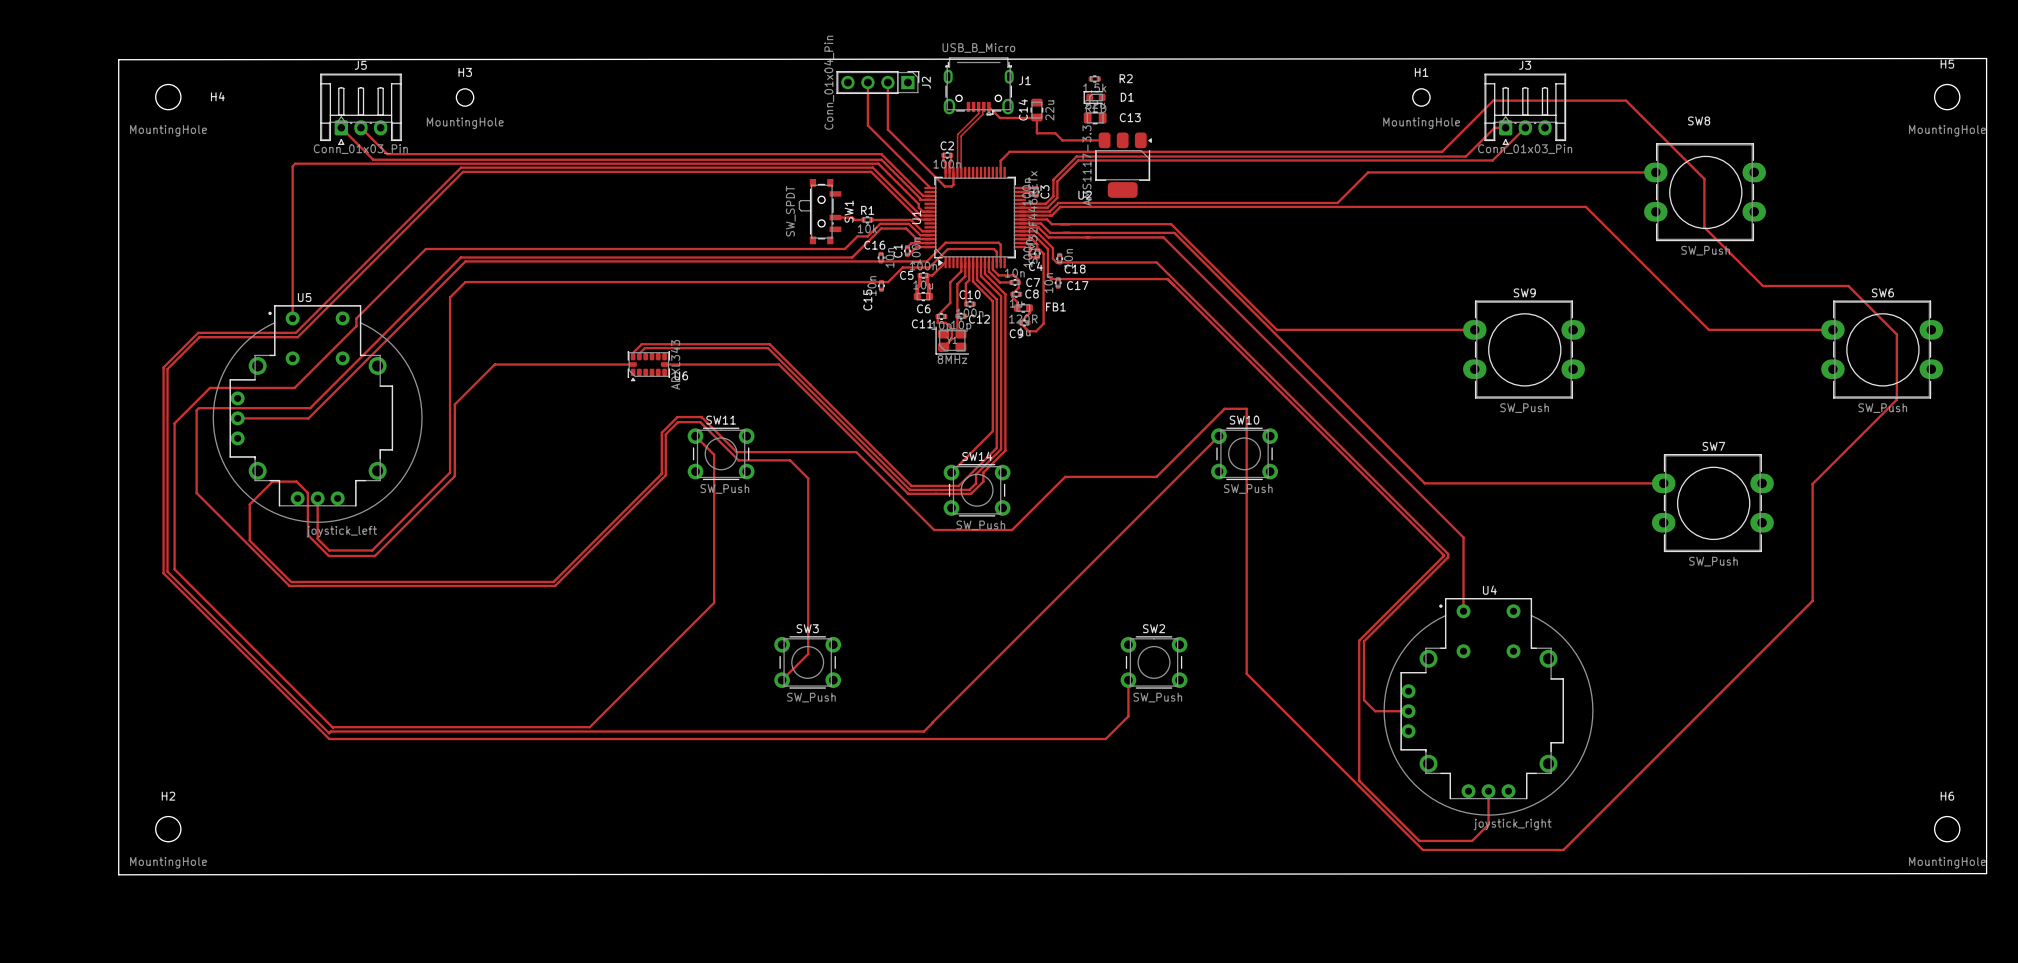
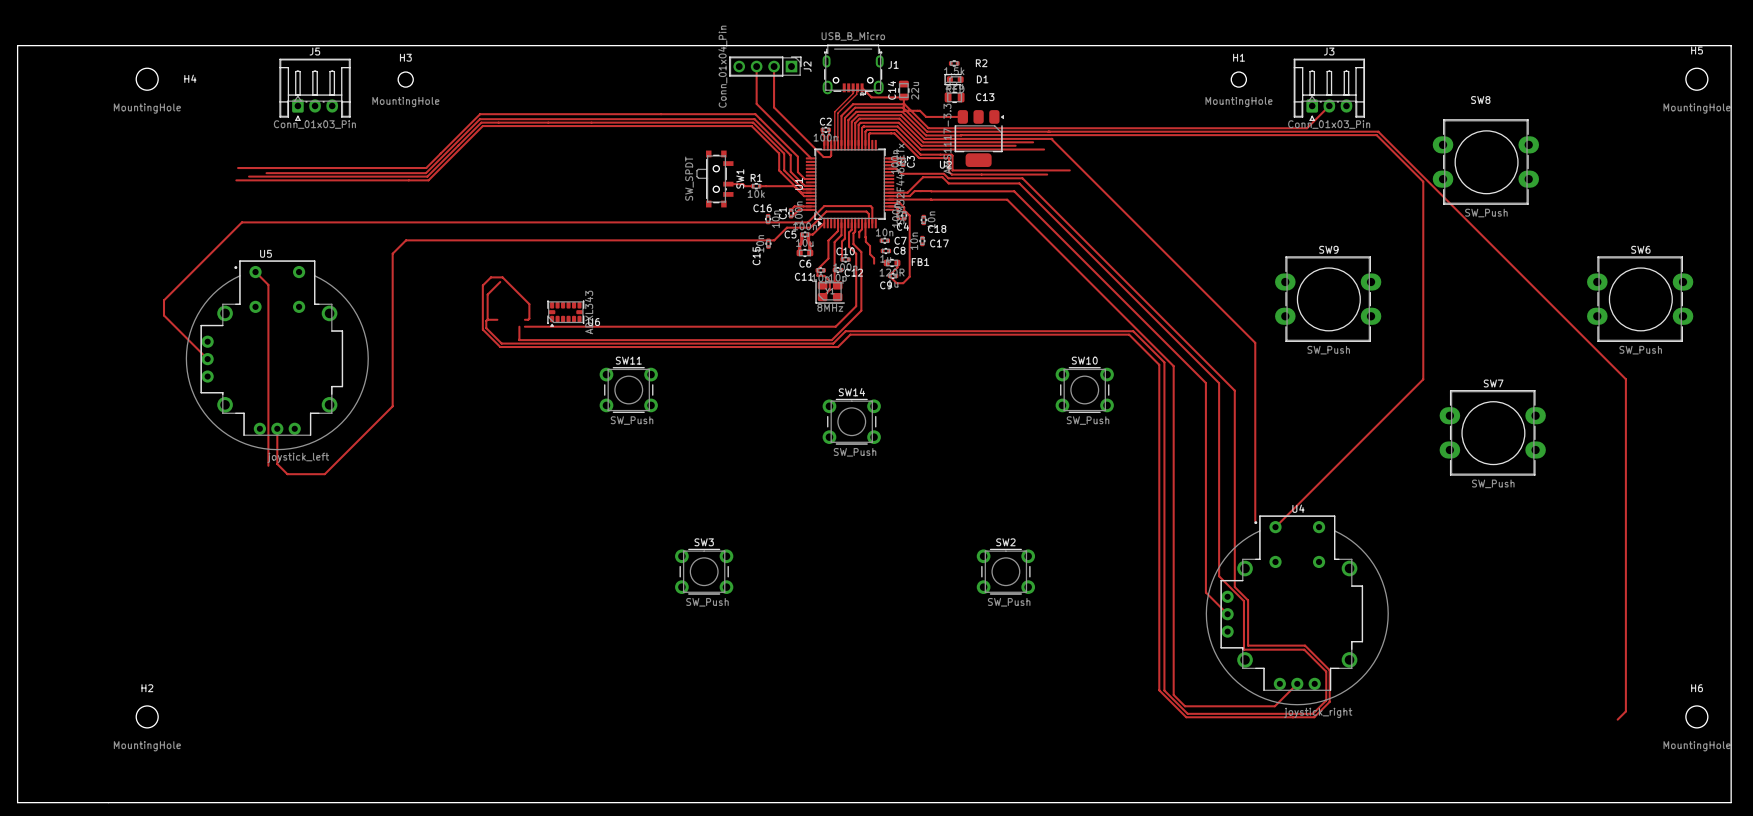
board edge: (1986, 58) (118, 59) (118, 874) (1986, 873) -> (1731, 45) (17, 45) (17, 802) (1731, 802) (1731, 755)
track: (341, 127) (373, 159) (881, 159) (920, 199) (930, 199) -> none
track: (360, 127) (387, 154) (881, 154) (923, 195) (930, 195) -> none
track: (1505, 127) (1494, 127) (1465, 156) (1076, 156) (1053, 179) (1053, 196) (1045, 203) (1019, 203) -> none
track: (1499, 153) (1492, 160) (1078, 160) (1057, 181) (1057, 197) (1047, 207) (1019, 207) -> (1307, 128) (928, 128) (904, 104) (853, 104) (841, 115) (841, 145)
track: none -> (1051, 138) (1255, 342) (1255, 521)
track: none -> (1052, 138) (924, 138) (900, 115) (858, 115) (851, 121) (851, 145)
track: none -> (1033, 142) (923, 142) (899, 118) (859, 118) (855, 123) (855, 145)
track: none -> (844, 145) (844, 117) (855, 107) (903, 107) (927, 131) (1378, 131) (1625, 379) (1625, 711) (1617, 719)
track: none -> (858, 145) (858, 124) (860, 122) (898, 122) (921, 145) (1015, 145)
track: none -> (862, 145) (862, 127) (863, 126) (897, 126) (920, 149) (1044, 149)
track: none -> (865, 145) (865, 131) (867, 129) (895, 129) (920, 154) (951, 154) (952, 170) (1069, 170)
track: none -> (868, 145) (869, 133) (894, 133) (919, 158) (949, 158) (949, 171) (951, 174) (1047, 174)
track: (1000, 172) (1000, 160) (1009, 151) (1442, 151) (1493, 100) (1626, 100) (1704, 178) (1704, 227) (1763, 286) (1848, 286) (1896, 334) (1896, 399) (1812, 483) (1812, 600) (1563, 849) (1422, 849) (1246, 673) (1246, 408) (1224, 408) (1156, 476) (1065, 476) (1012, 530) (934, 530) (856, 452) (736, 452) (701, 417) (677, 417) (661, 432) (661, 473) (553, 581) (291, 581) (249, 540) (249, 504) (272, 481) (296, 481) (307, 492) (308, 535) (328, 556) (374, 556) (454, 476) (454, 404) (494, 364) (633, 364) -> none
track: (1655, 172) (1368, 172) (1337, 202) (1058, 202) (1049, 211) (1019, 211) -> none
track: none -> (888, 168) (896, 168) (901, 173) (943, 173) (948, 178) (1022, 178) (1234, 390) (1234, 587) (1248, 600) (1248, 645) (1305, 645) (1329, 670) (1329, 701) (1314, 717) (1186, 717) (1159, 690) (1159, 364) (1129, 334) (850, 334) (838, 347) (500, 347) (482, 329) (482, 285) (490, 277) (502, 277) (529, 304) (529, 318) (524, 319)
track: none -> (249, 176) (427, 176) (481, 122) (753, 122) (784, 153) (784, 170) (803, 189) (811, 189)
track: (923, 211) (918, 207) (918, 204) (878, 163) (295, 163) (292, 166) (292, 318) -> (804, 178) (797, 172) (797, 156) (755, 114) (480, 114) (426, 168) (238, 168)
track: none -> (236, 180) (428, 180) (482, 126) (751, 126) (779, 153) (779, 170) (801, 192) (811, 192)
track: (930, 215) (920, 215) (872, 167) (461, 167) (295, 332) (198, 332) (163, 367) (163, 573) (329, 739) (1105, 739) (1128, 716) (1128, 680) -> none
track: (1019, 215) (1051, 215) (1060, 206) (1585, 206) (1708, 329) (1832, 329) -> none
track: (923, 219) (918, 219) (871, 171) (463, 171) (297, 337) (199, 337) (167, 369) (167, 571) (329, 733) (330, 731) (923, 731) (1218, 436) -> (804, 185) (790, 171) (790, 155) (754, 119) (479, 119) (425, 173) (266, 173)
track: (1019, 219) (1047, 219) (1051, 224) (1171, 224) (1276, 329) (1474, 329) -> none
track: (1019, 223) (1040, 223) (1050, 232) (1174, 232) (1424, 483) (1663, 483) -> none
track: (1038, 227) (1048, 237) (1163, 237) (1463, 537) (1463, 611) -> (848, 145) (848, 120) (856, 111) (902, 111) (926, 135) (1376, 135) (1423, 181) (1423, 379) (1275, 527)
track: none -> (905, 192) (907, 192) (923, 177) (942, 177) (948, 183) (1019, 183) (1219, 383) (1219, 576) (1243, 601) (1243, 649) (1304, 649) (1326, 671) (1326, 700) (1312, 713) (1187, 713) (1164, 690) (1164, 362) (1133, 331) (845, 331) (833, 343) (501, 343) (486, 328) (487, 319)
track: (1036, 231) (1052, 248) (1052, 258) (1056, 262) (1156, 262) (1448, 553) (1448, 557) (1363, 641) (1363, 700) (1375, 711) (1408, 711) -> (903, 196) (909, 196) (914, 191) (1014, 191) (1205, 382) (1205, 592) (1227, 614)
track: (930, 235) (920, 235) (908, 223) (880, 223) (867, 236) (857, 236) (844, 249) (425, 249) (356, 318) (356, 326) (294, 387) (210, 387) (174, 423) (174, 569) (332, 727) (589, 727) (714, 602) (714, 454) (695, 436) -> none
track: (1034, 235) (1047, 249) (1047, 275) (1051, 279) (1167, 279) (1443, 556) -> (901, 199) (931, 199)
track: (930, 239) (916, 239) (906, 228) (881, 228) (852, 257) (460, 257) (310, 408) (198, 408) (196, 410) (196, 493) (289, 585) (555, 585) (665, 475) (665, 434) (677, 422) (700, 422) (738, 460) (790, 460) (808, 478) (808, 654) (782, 680) -> none
track: (465, 261) (308, 418) (237, 418) -> (406, 222) (241, 222) (164, 300) (164, 315) (207, 359)
track: (973, 262) (973, 281) (992, 301) (992, 431) (951, 472) -> none
track: (984, 262) (984, 273) (1005, 294) (1005, 450) (983, 472) (983, 481) (971, 493) (908, 493) (778, 364) (664, 364) -> none
track: (977, 269) (977, 279) (996, 299) (996, 448) (958, 485) (911, 485) (769, 344) (641, 344) (633, 352) (633, 356) -> (851, 229) (849, 232) (849, 246) (856, 253) (856, 306) (835, 326) (524, 326)
track: (988, 269) (999, 282) (1011, 282) -> (862, 229) (859, 232) (859, 237)
track: (992, 269) (998, 275) (1014, 275) (1018, 280) (1018, 287) (1012, 293) (1012, 297) (1017, 301) (1017, 308) -> (865, 229) (865, 241) (870, 245) (870, 254) (874, 258) (874, 263)
track: (981, 271) (981, 276) (1001, 296) (1001, 449) (976, 474) (976, 483) (969, 489) (909, 489) (768, 348) (644, 348) (639, 353) (639, 356) -> (855, 231) (853, 244) (861, 252) (861, 310) (831, 340) (519, 340) (519, 326)
track: none -> (255, 272) (268, 284) (268, 465)
track: none -> (500, 282) (487, 294) (487, 319)
track: none -> (487, 319) (497, 319)
track: (1444, 555) (1359, 640) (1359, 780) (1419, 840) (1472, 840) (1488, 824) (1488, 791) -> (931, 199) (1007, 199) (1173, 366) (1173, 694) (1185, 706) (1274, 706) (1297, 683)

